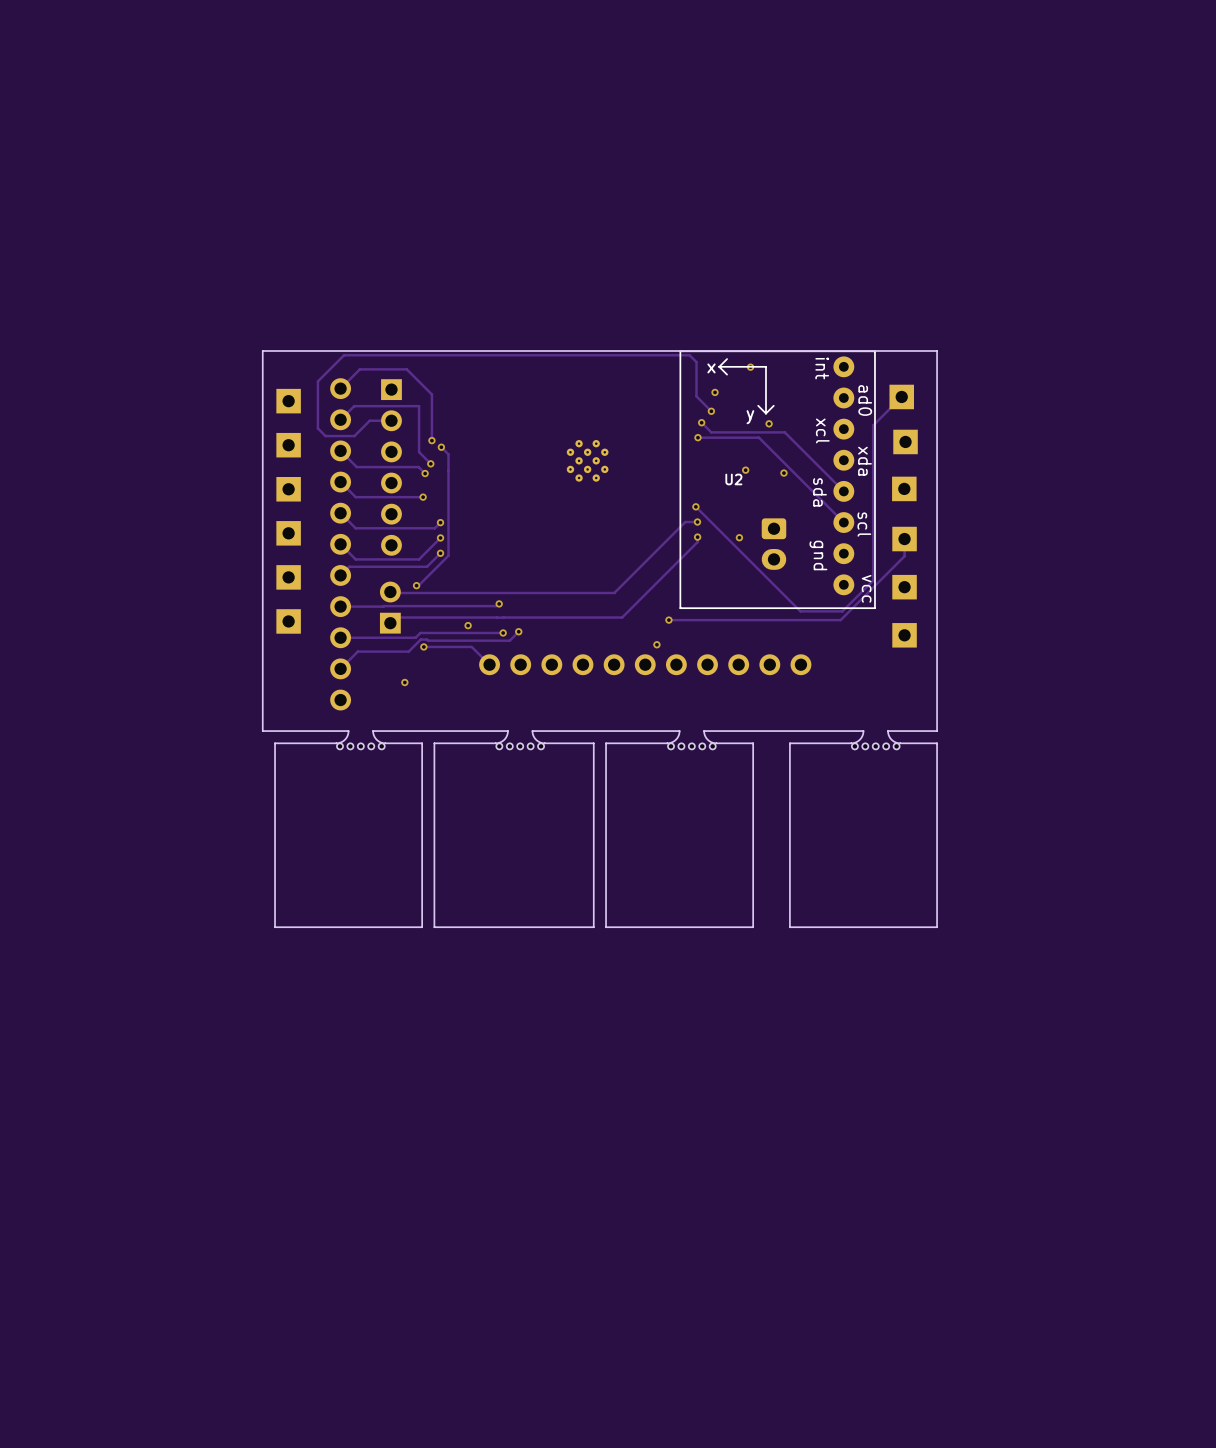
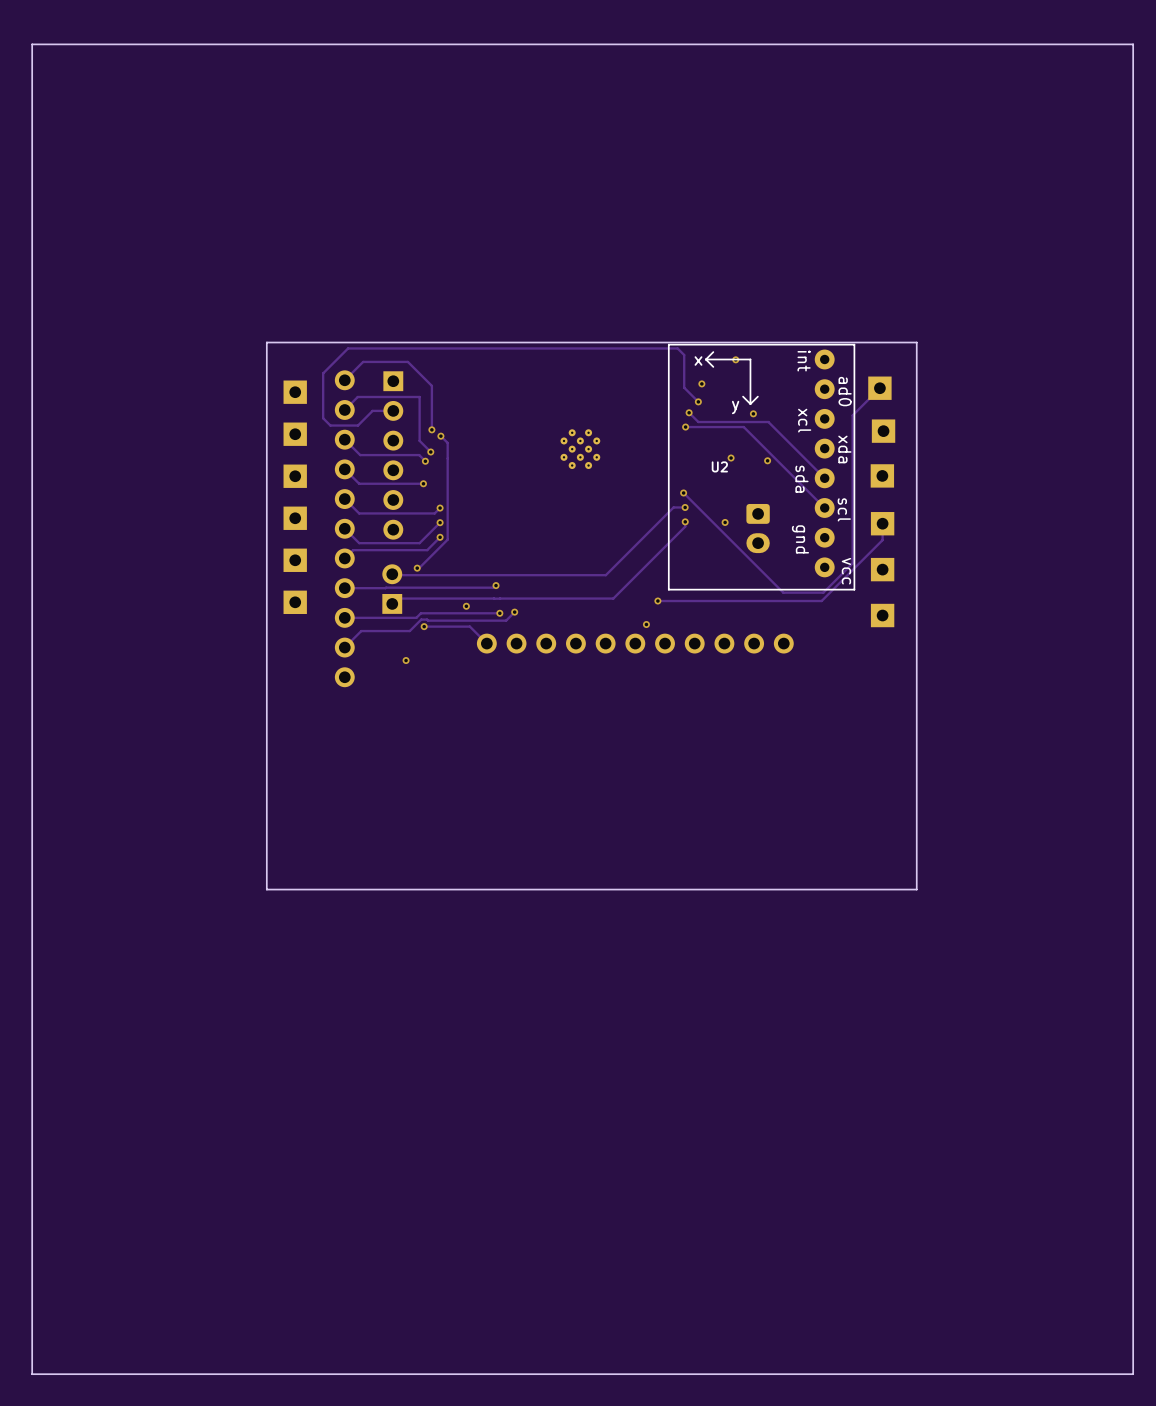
board edge: none -> (1133, 44) (32, 44) (32, 1374) (1133, 1374) (1133, 44)
board edge: none -> (916, 342) (266, 342) (266, 889) (916, 889) (916, 342)
board edge: (507, 731) (373, 731) -> none
board edge: (679, 731) (532, 731) -> none
board edge: (863, 731) (704, 731) -> none
board edge: (888, 731) (937, 731) (937, 350) (262, 350) (262, 731) (348, 731) -> none
part: (360, 739) -> none
part: (520, 739) -> none
part: (691, 739) -> none
part: (875, 739) -> none
board edge: (385, 743) (422, 743) (422, 927) (275, 927) (275, 743) (336, 743) -> none
board edge: (544, 743) (593, 743) (593, 927) (434, 927) (434, 743) (495, 743) -> none
board edge: (716, 743) (753, 743) (753, 927) (606, 927) (606, 743) (667, 743) -> none
board edge: (900, 743) (937, 743) (937, 927) (789, 927) (789, 743) (851, 743) -> none

